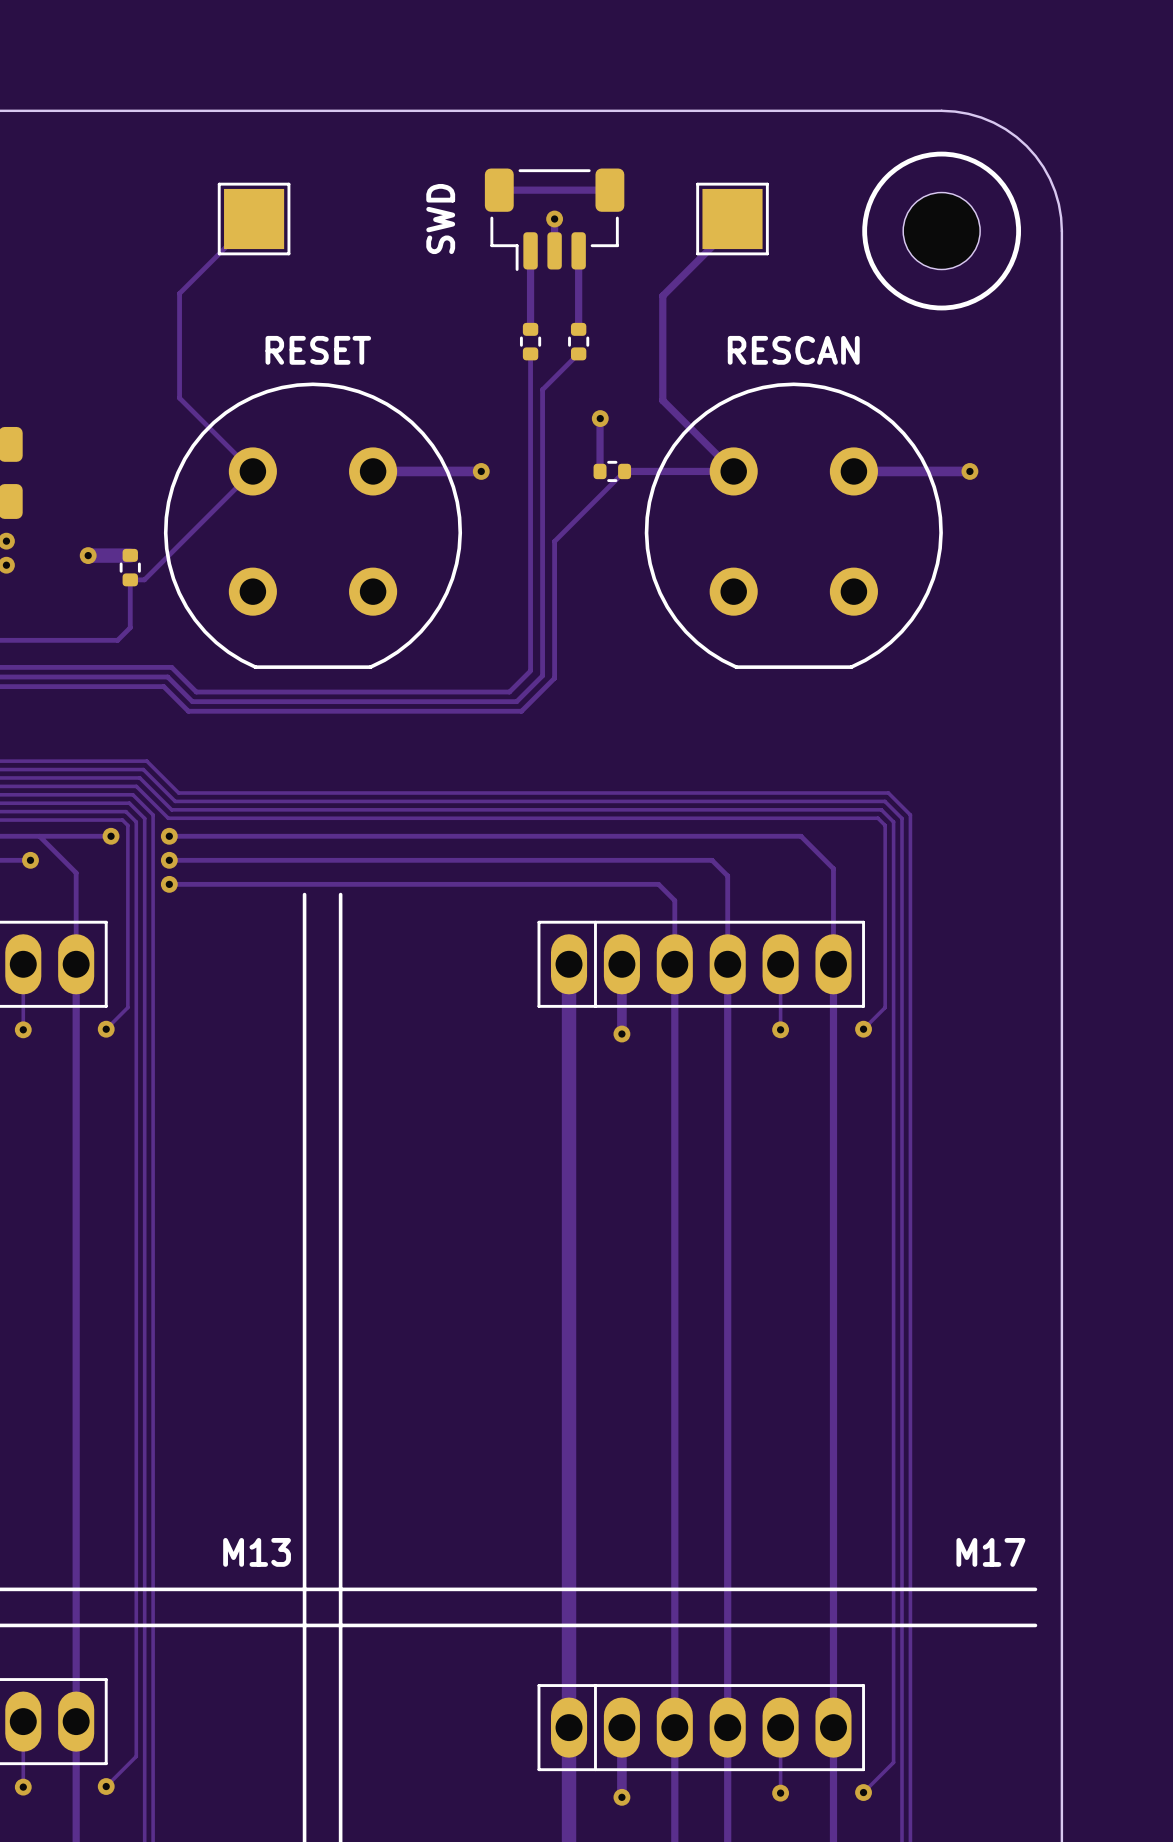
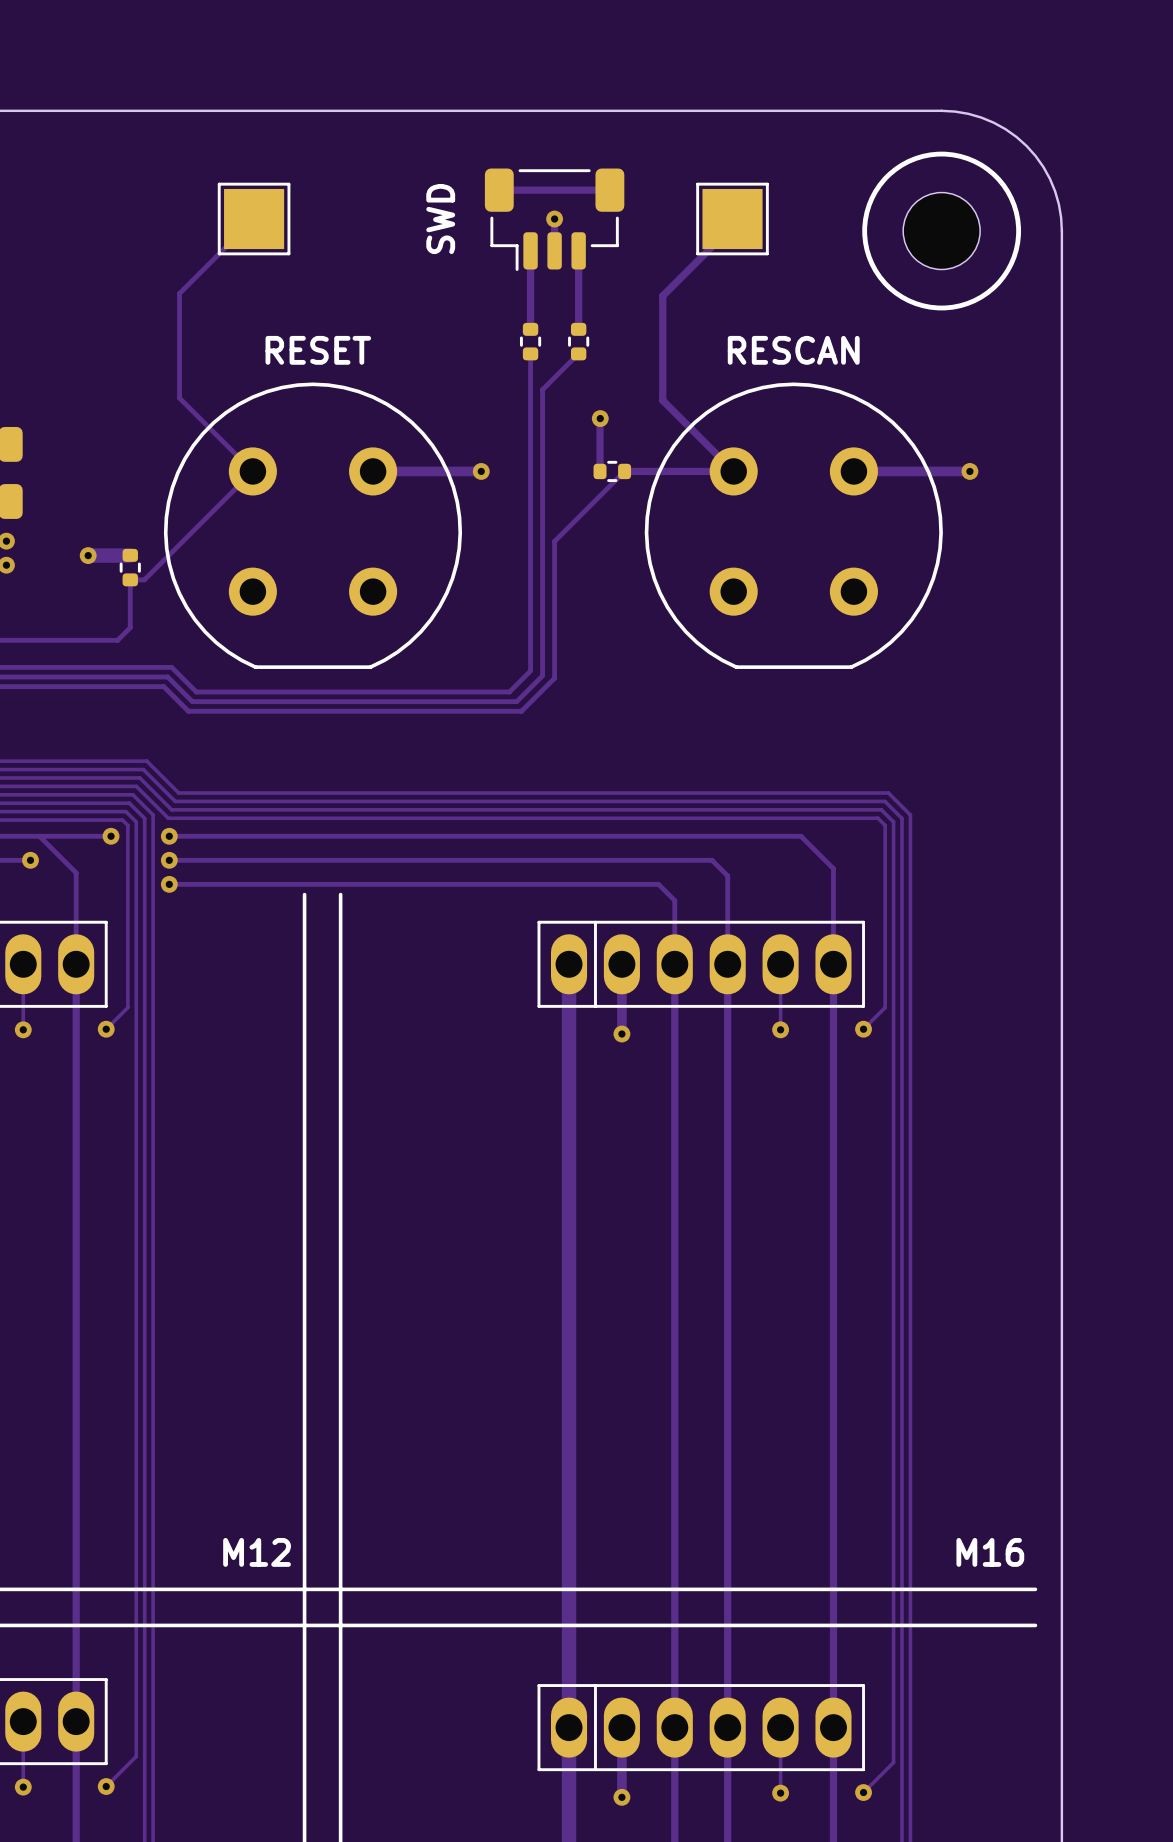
M13 name: M13 (257, 1552) -> M12 (257, 1552)
M17 name: M17 (990, 1552) -> M16 (990, 1552)

